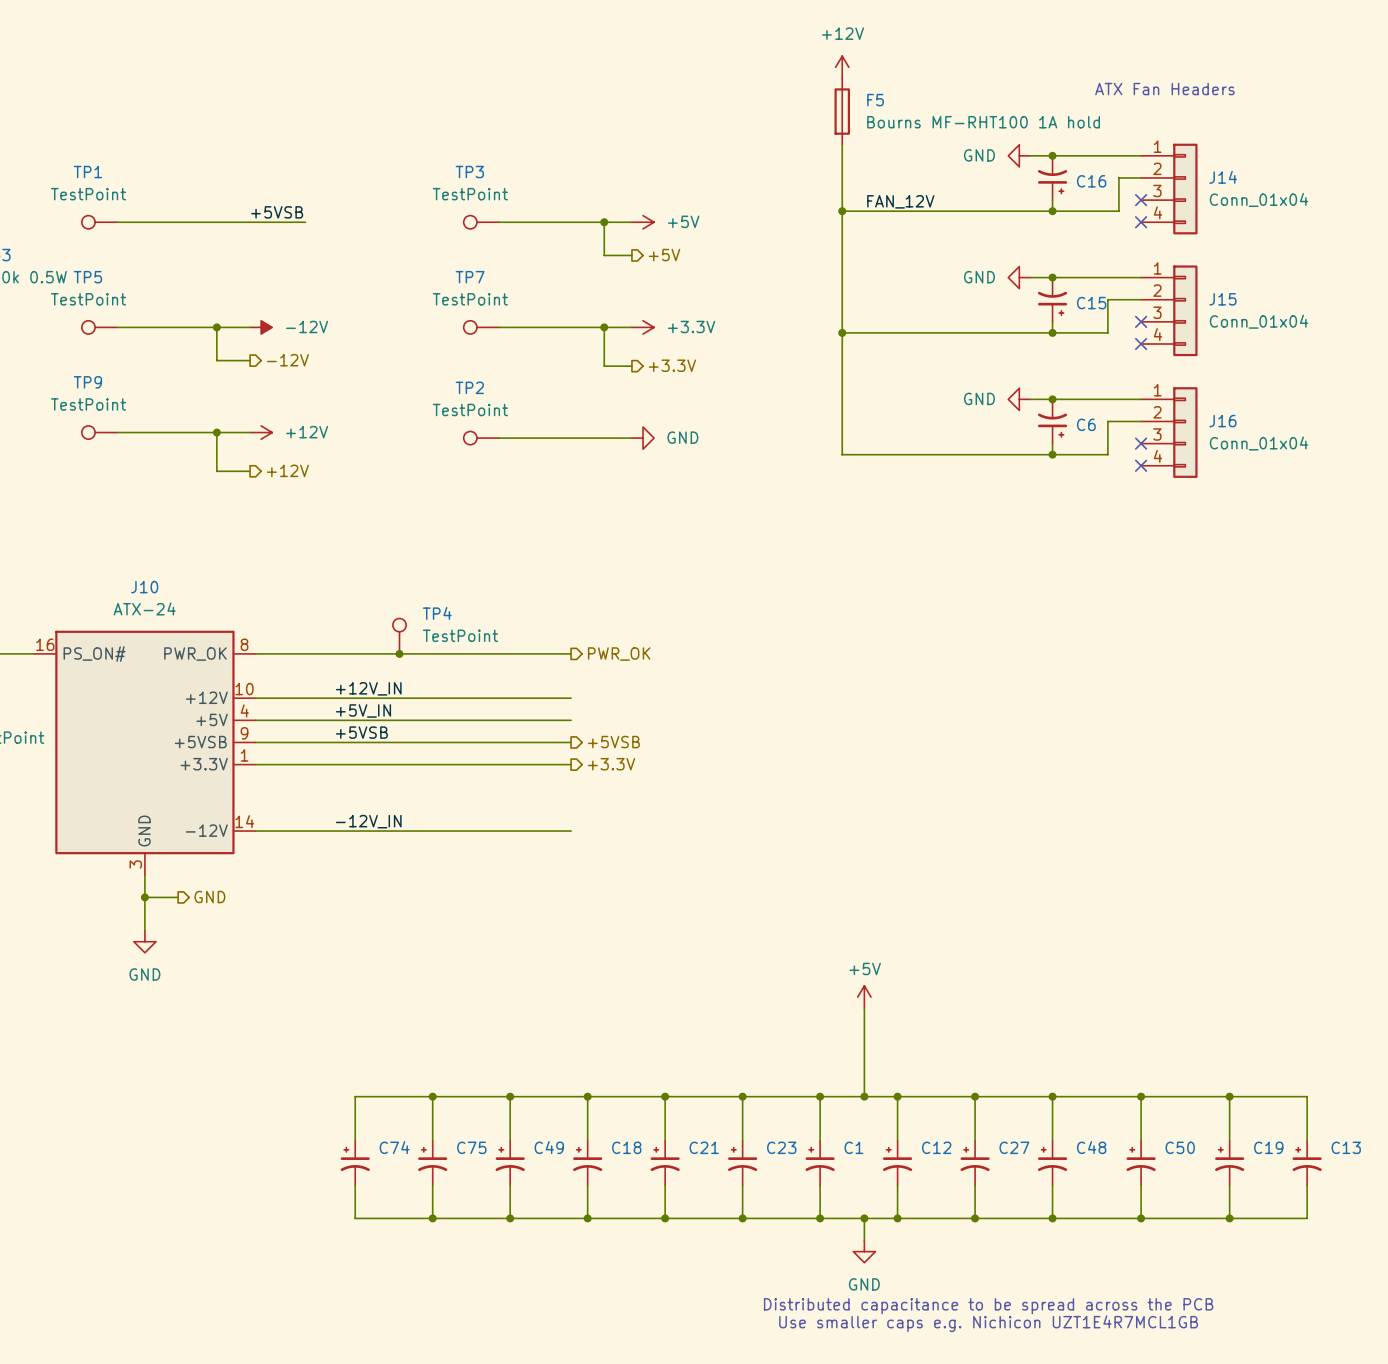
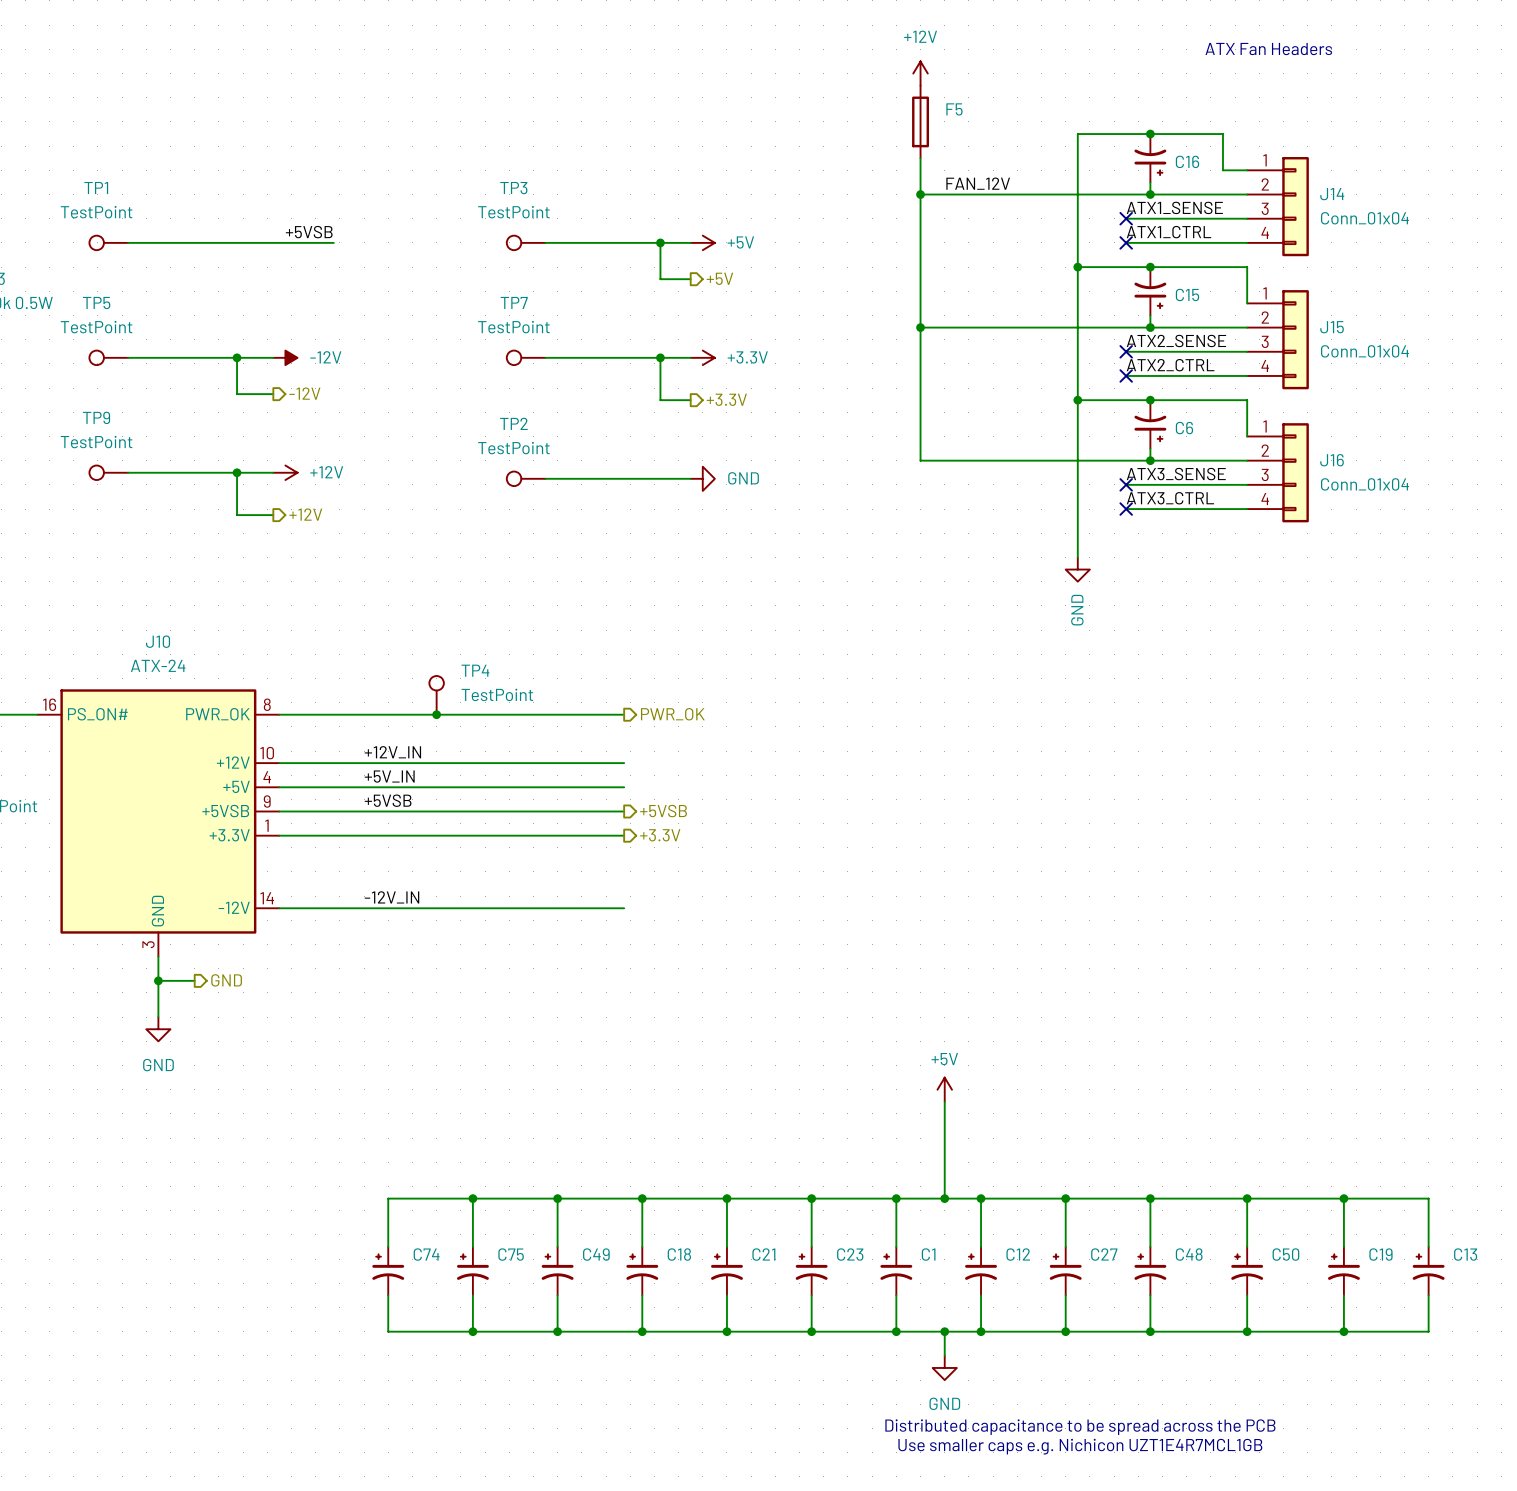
text position: ATX Fan Headers (1164, 89) -> ATX Fan Headers (1268, 49)
F5 value: Bourns MF-RHT100 1A hold (983, 122) -> none
junction: none -> (1150, 134)
power symbol: GND (1019, 155) -> none
wire: (1030, 155) (1118, 155) -> (1077, 557) (1077, 134) (1222, 134) (1222, 170)
junction: (1052, 155) -> none
junction: none -> (1150, 194)
C16 position: (1052, 177) -> (1150, 158)
wire: (1118, 177) (1118, 211) (842, 211) -> (1222, 194) (920, 194)
label: none -> ATX1_SENSE (1174, 207)
wire: none -> (1126, 218) (1247, 218)
no-connect mark: none -> (1126, 218)
no-connect mark: (1141, 200) -> none
label position: FAN_12V (900, 201) -> FAN_12V (978, 183)
junction position: (842, 211) -> (920, 194)
junction: (1052, 211) -> none
label: none -> ATX1_CTRL (1168, 232)
wire: none -> (1126, 242) (1247, 242)
no-connect mark: none -> (1126, 242)
no-connect mark: (1141, 222) -> none
junction: none -> (1077, 267)
junction: none -> (1150, 267)
power symbol: GND (1019, 277) -> none
wire: (1030, 277) (1141, 277) -> (1077, 267) (1247, 267) (1247, 303)
junction: (1052, 277) -> none
junction: none -> (1150, 327)
C15 position: (1052, 299) -> (1150, 291)
wire: (1107, 299) (1107, 332) (842, 332) -> (1210, 327) (920, 327)
label: none -> ATX2_SENSE (1176, 340)
wire: none -> (1126, 351) (1247, 351)
no-connect mark: none -> (1126, 351)
no-connect mark: (1141, 321) -> none
junction position: (842, 332) -> (920, 327)
junction: (1052, 332) -> none
label: none -> ATX2_CTRL (1170, 365)
wire: none -> (1126, 375) (1247, 375)
no-connect mark: none -> (1126, 375)
no-connect mark: (1141, 344) -> none
junction: none -> (1077, 400)
junction: none -> (1150, 400)
power symbol: GND (1019, 399) -> none
wire: (1030, 399) (1141, 399) -> (1077, 400) (1247, 400) (1247, 436)
junction: (1052, 399) -> none
wire: (842, 421) (842, 454) (1107, 454) (1107, 421) -> (920, 460) (1210, 460)
junction: none -> (1150, 460)
C6 position: (1052, 421) -> (1150, 424)
label: none -> ATX3_SENSE (1176, 474)
wire: none -> (1126, 484) (1247, 484)
no-connect mark: none -> (1126, 484)
no-connect mark: (1141, 443) -> none
junction: (1052, 454) -> none
label: none -> ATX3_CTRL (1170, 498)
wire: none -> (1126, 509) (1247, 509)
no-connect mark: none -> (1126, 509)
no-connect mark: (1141, 465) -> none
power symbol: none -> GND (1077, 569)

